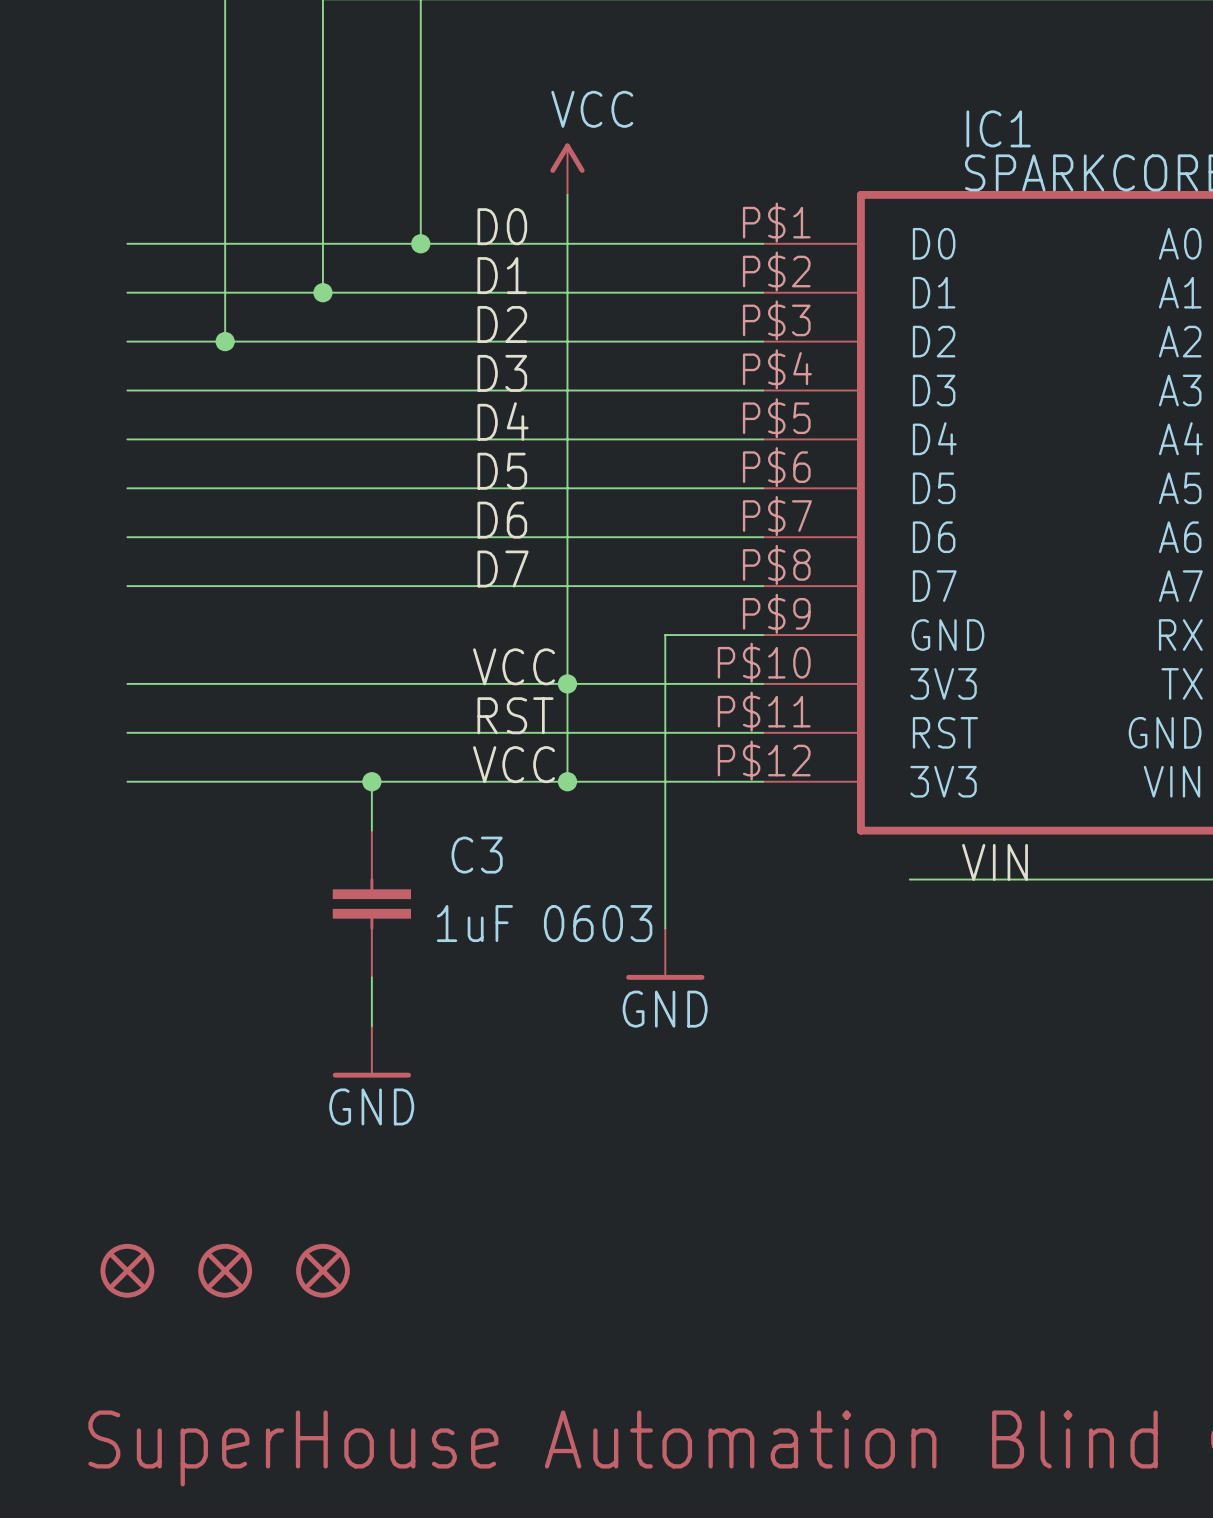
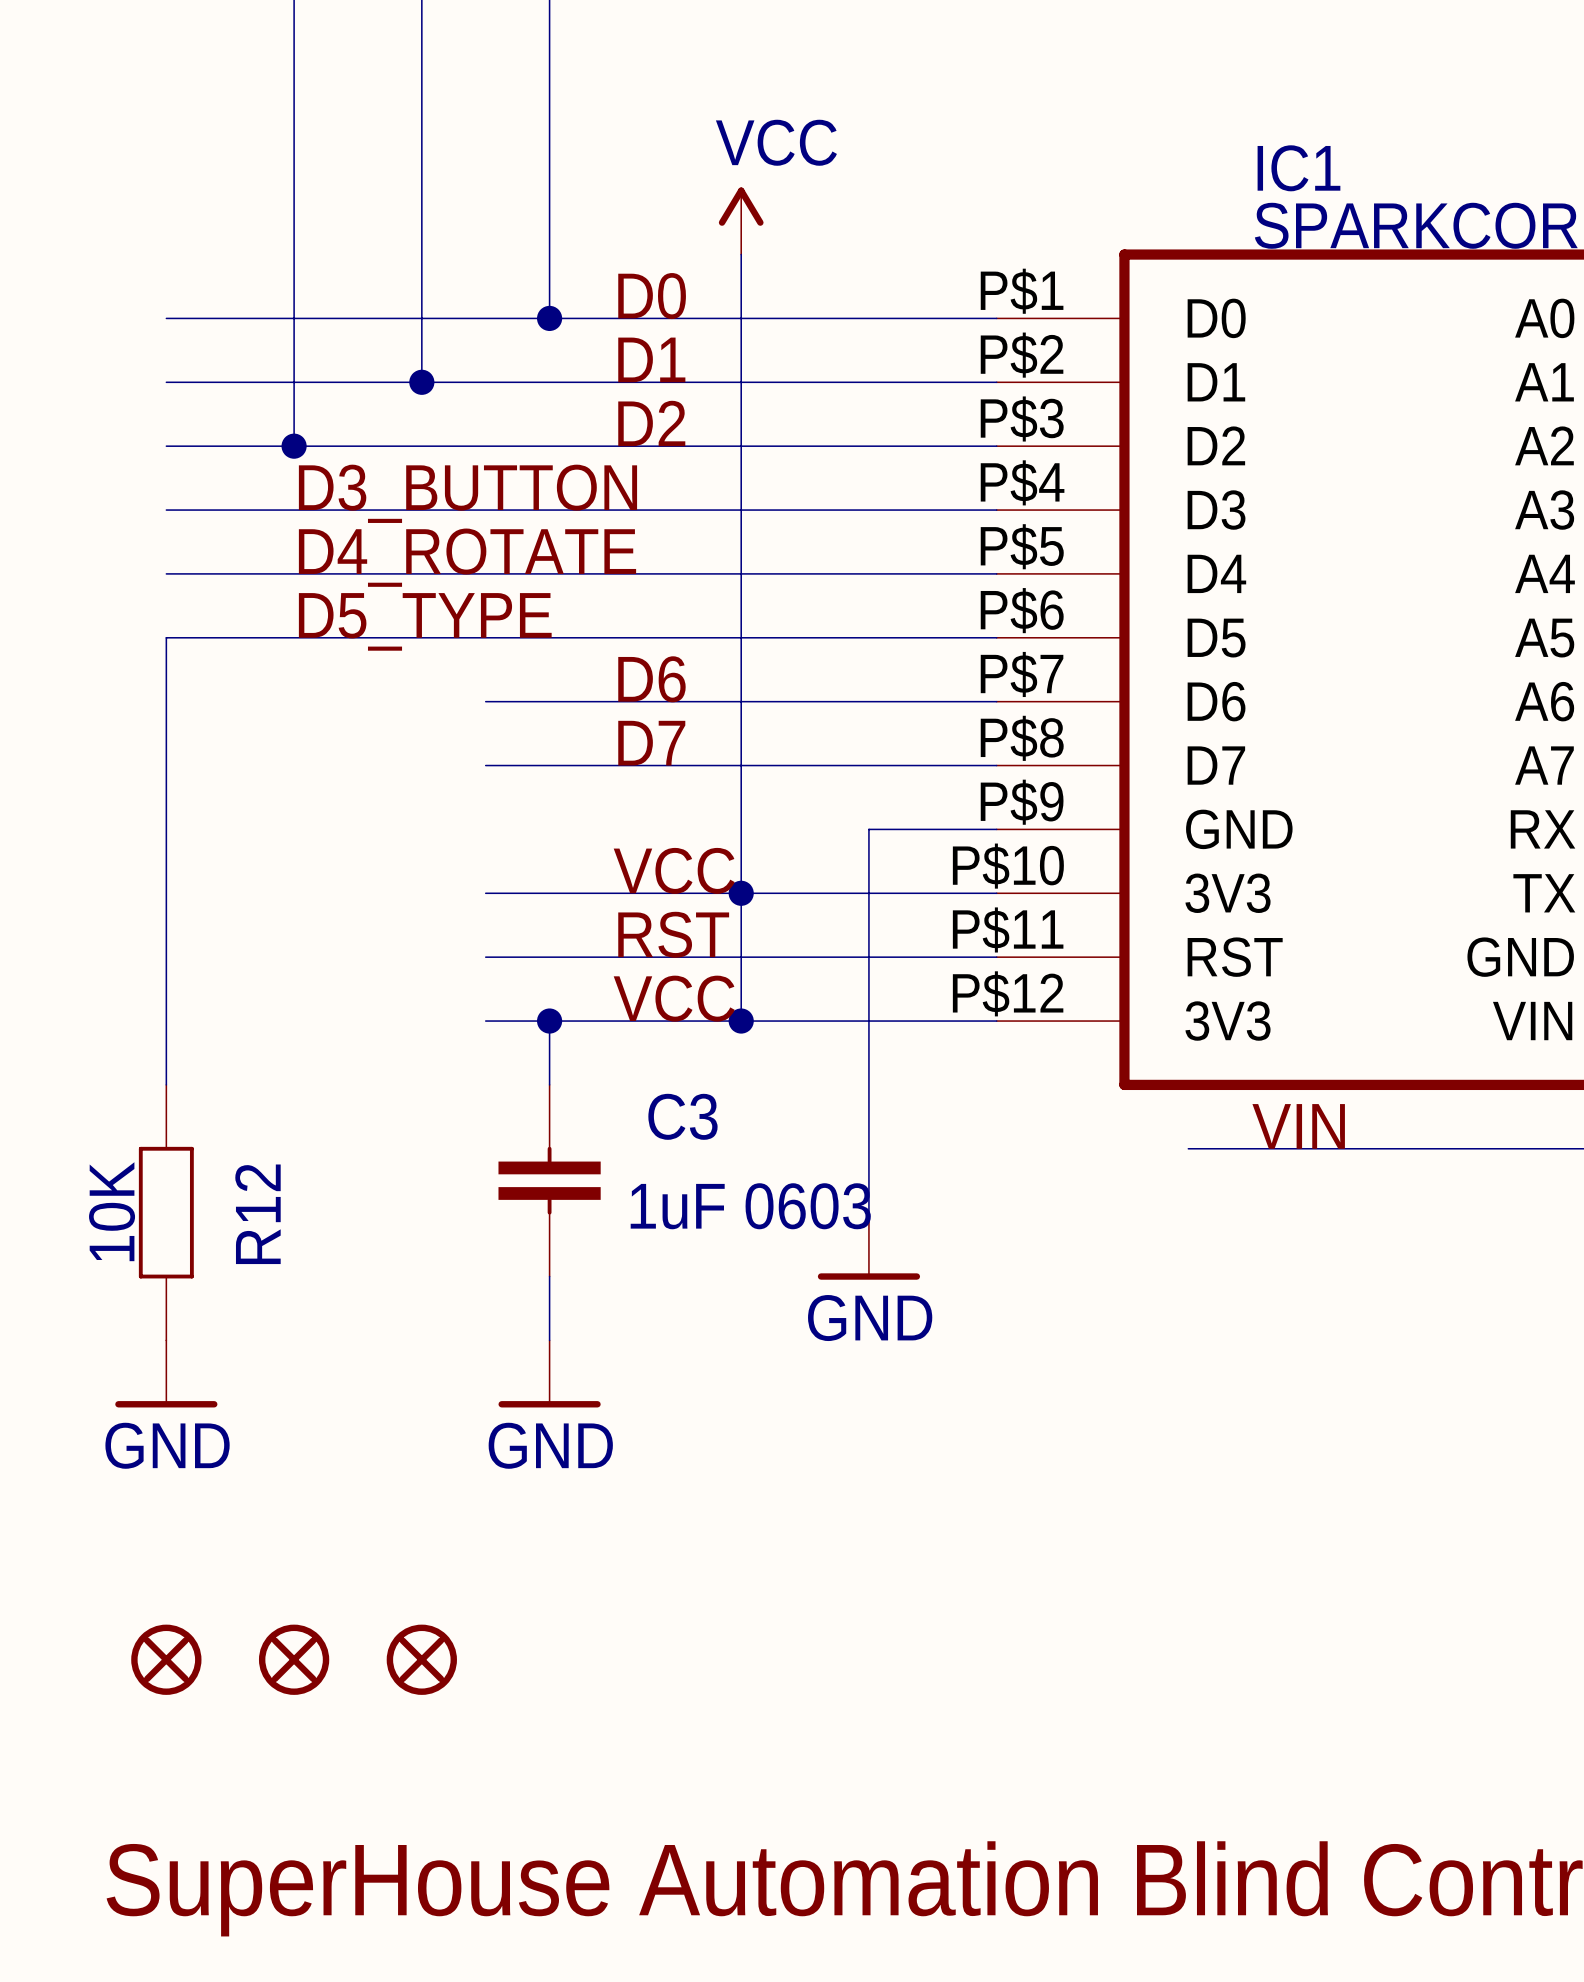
label: D3 (502, 373) -> none
label: none -> D3_BUTTON (467, 493)
label: D4 (503, 421) -> none
label: none -> D4_ROTATE (467, 557)
label: D5 (502, 471) -> none
label: none -> D5_TYPE (425, 621)
wire: none -> (166, 637) (166, 1084)
wire: (127, 537) (371, 537) -> none
wire: (127, 586) (371, 586) -> none
wire: (127, 683) (371, 683) -> none
wire: (127, 732) (371, 732) -> none
wire: (127, 781) (371, 781) (371, 830) -> none
junction position: (371, 781) -> (549, 1021)
wire: none -> (549, 1021) (549, 1084)
C3 position: (371, 903) -> (549, 1180)
R12: none -> 10K (166, 1212)
wire: (371, 977) (371, 1026) -> (549, 1276) (549, 1340)
power symbol: none -> GND (166, 1373)
power symbol position: GND (371, 1051) -> GND (549, 1373)

